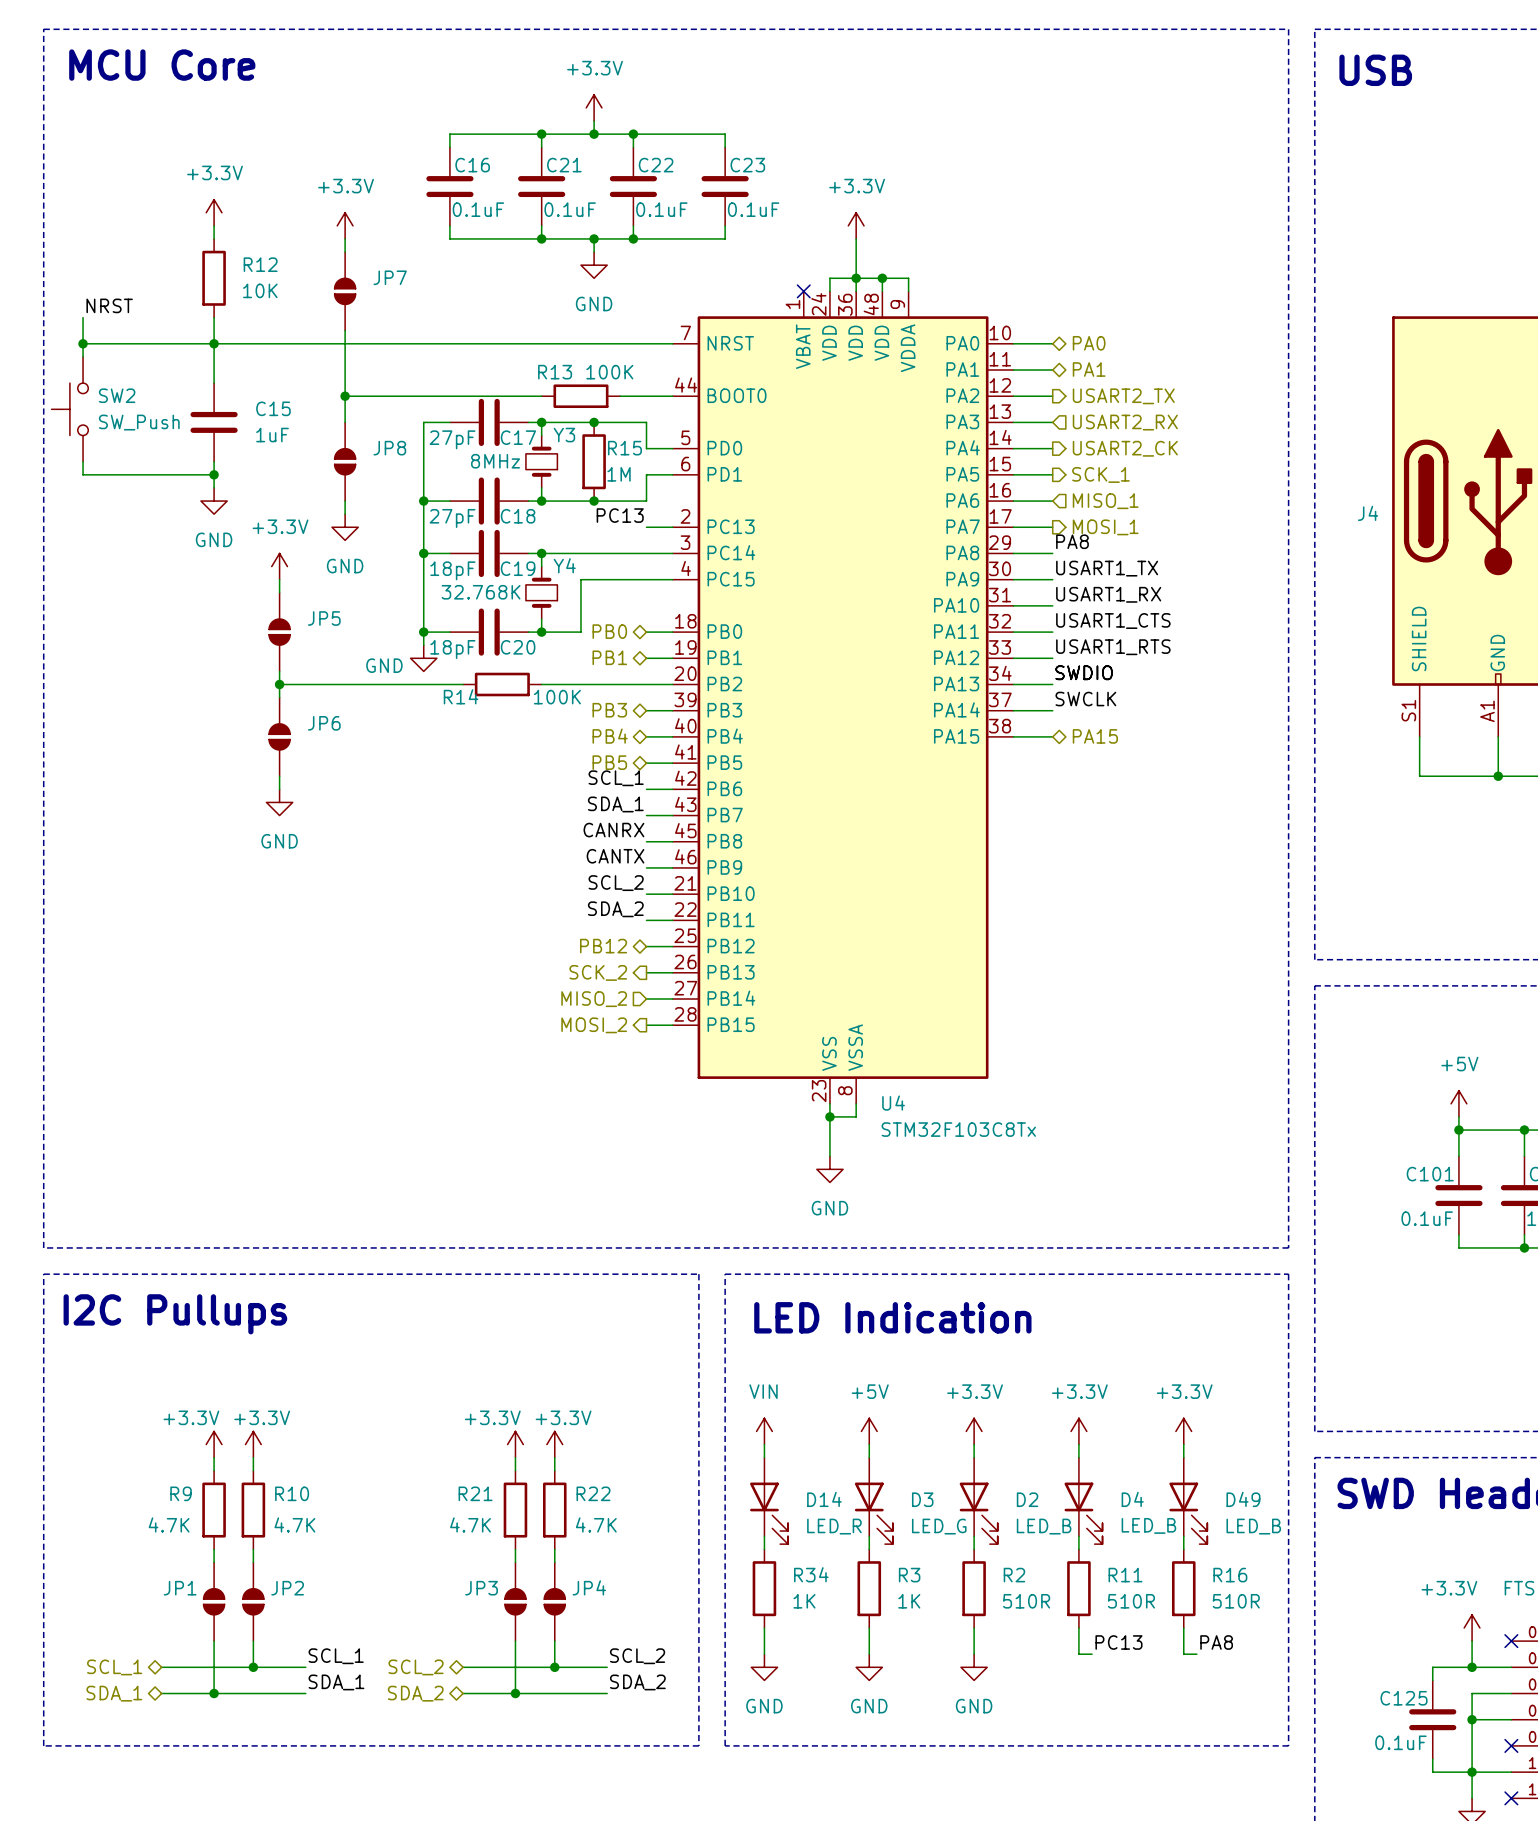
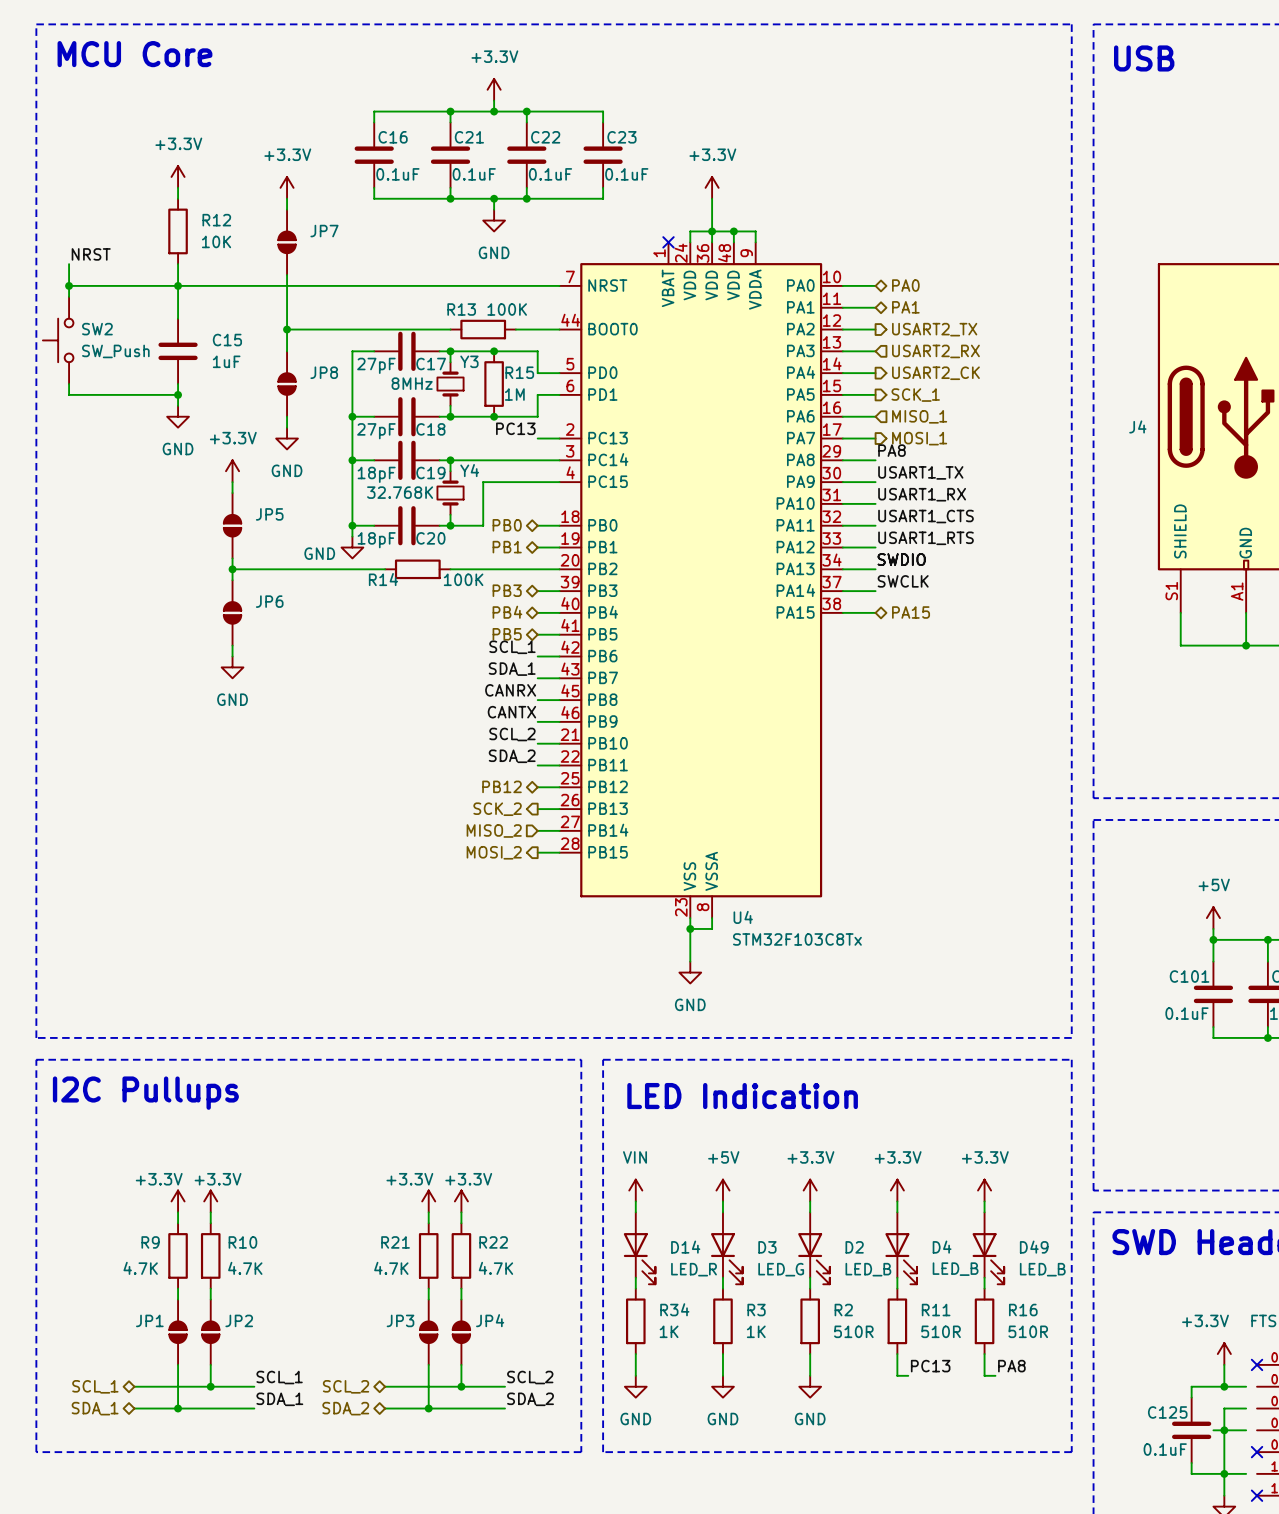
wire: (1498, 1667) (1511, 1667) -> none
wire: (1498, 1693) (1511, 1693) -> none
wire: (1498, 1719) (1511, 1719) -> (1213, 1430) (1224, 1430)
wire: (1498, 1772) (1511, 1772) -> none

